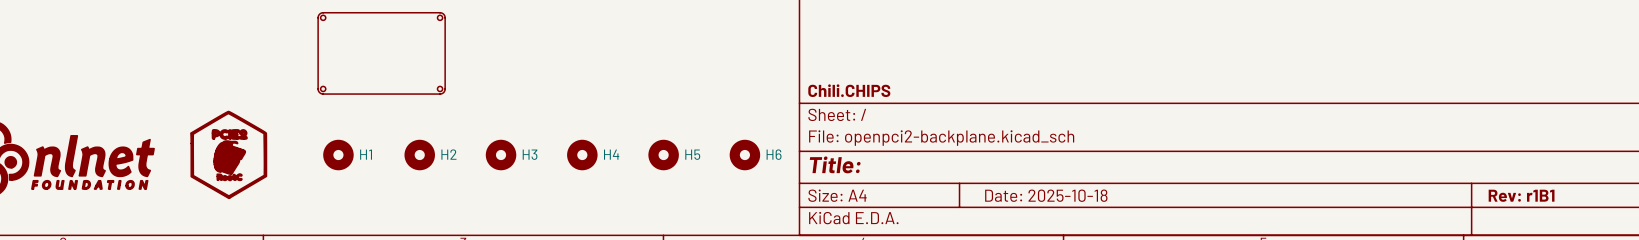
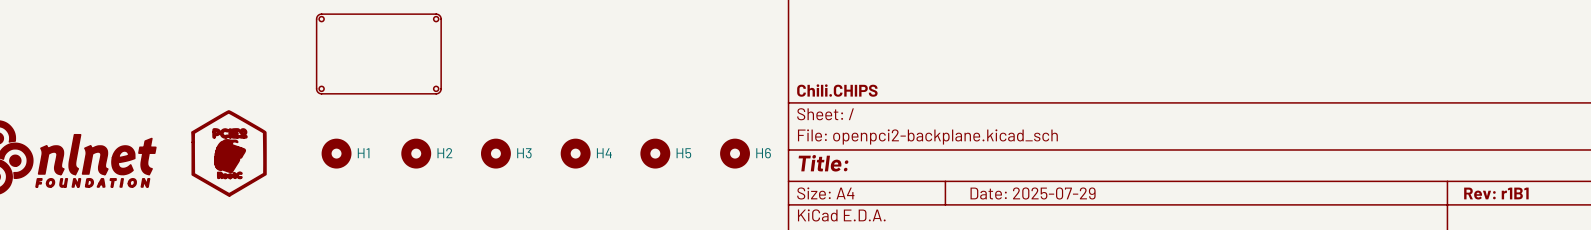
title block: Date: 2025-10-18 (1046, 195) -> Date: 2025-07-29 (1033, 193)

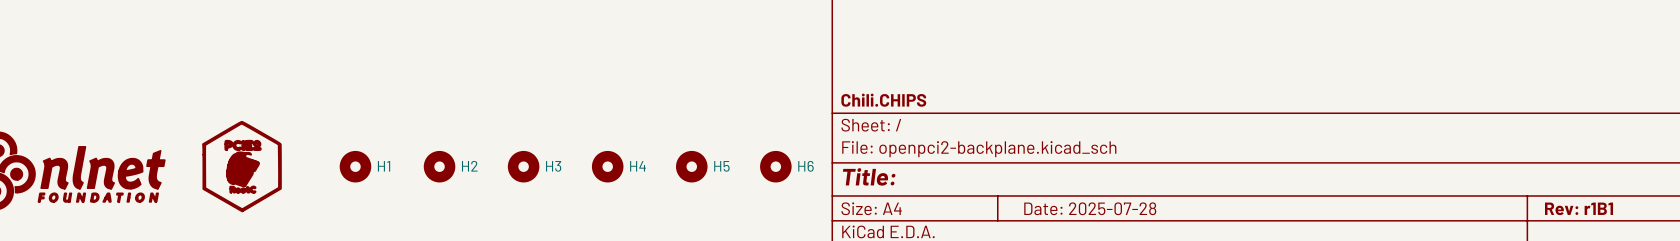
part: (378, 53) -> none
title block: Date: 2025-07-29 (1033, 193) -> Date: 2025-07-28 (1090, 208)

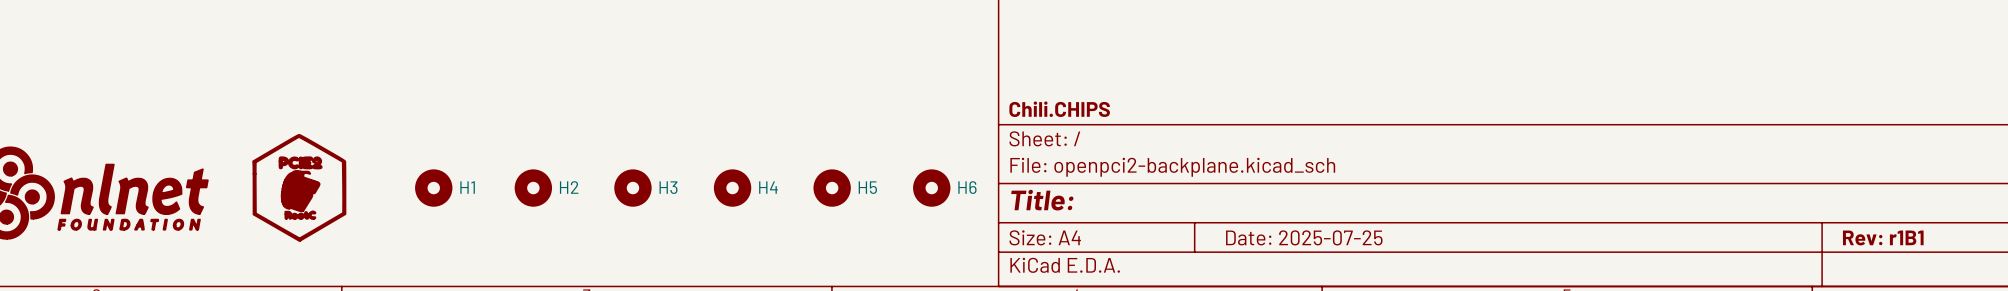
title block: Date: 2025-07-28 (1090, 208) -> Date: 2025-07-25 (1304, 237)

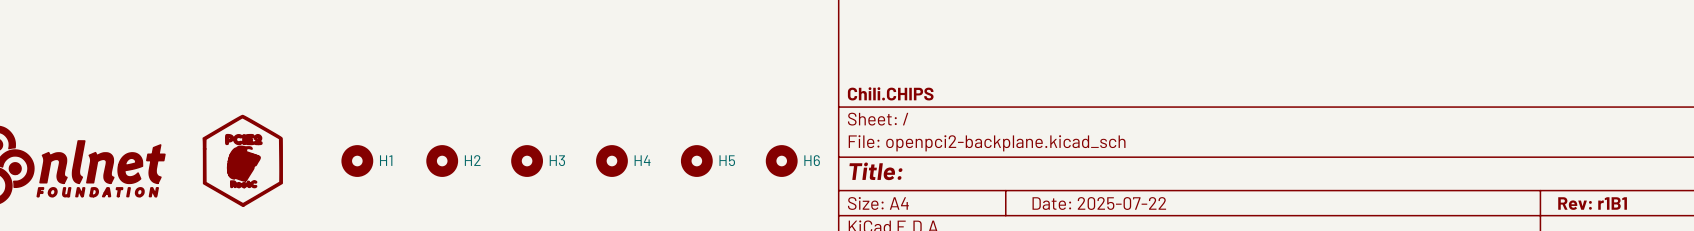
title block: Date: 2025-07-25 (1304, 237) -> Date: 2025-07-22 (1099, 203)

